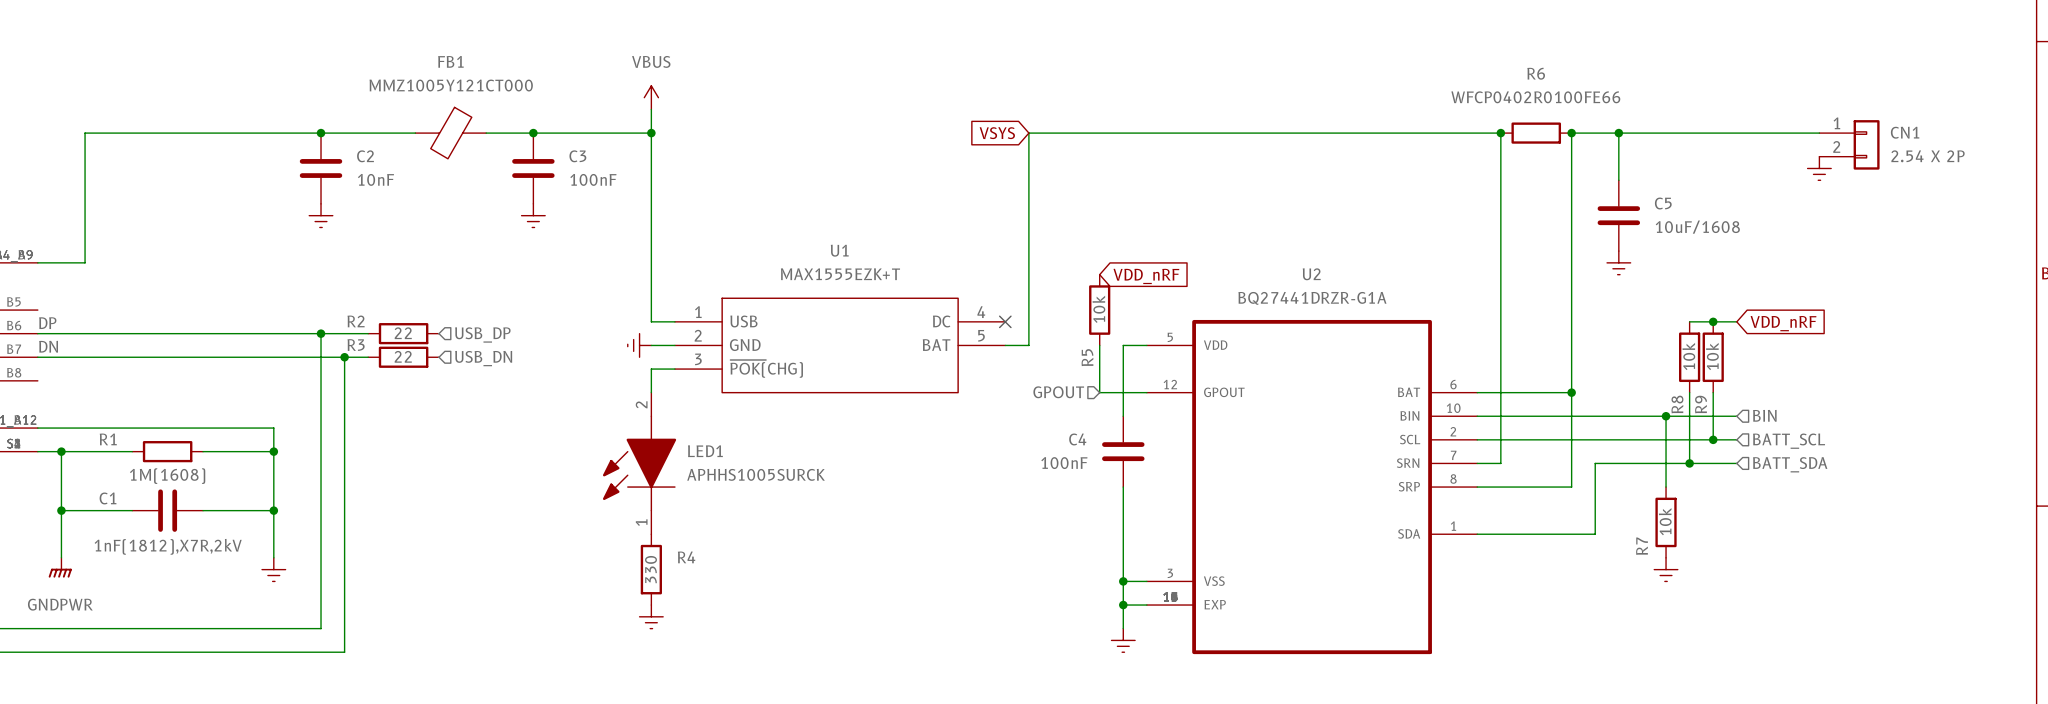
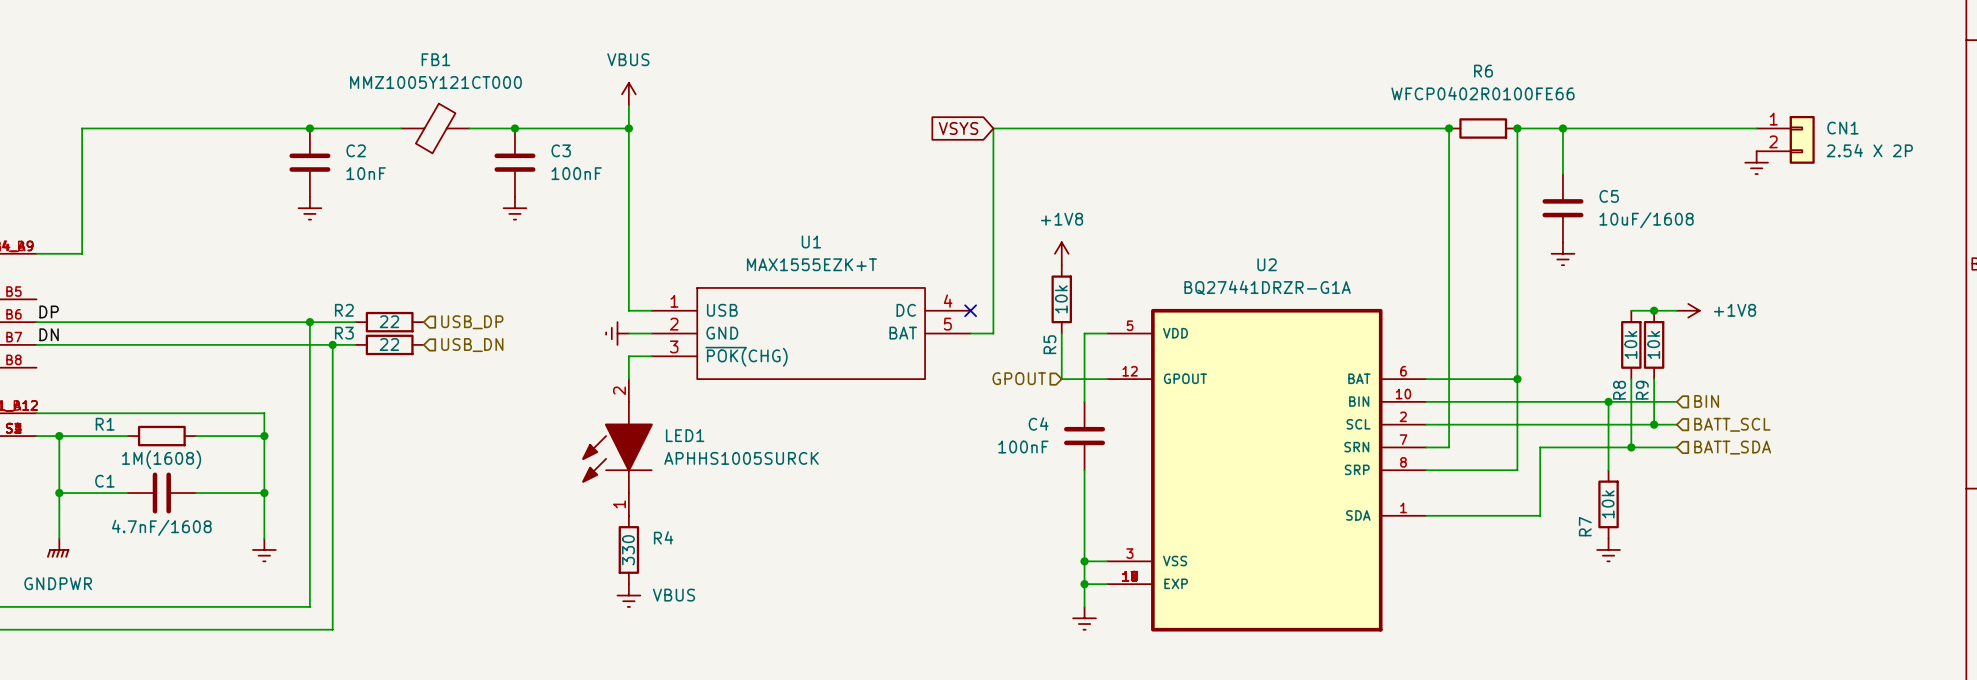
power symbol: none -> +1V8 (1061, 253)
global label: VDD_nRF (1146, 276) -> none
power symbol: none -> +1V8 (1688, 310)
global label: VDD_nRF (1783, 323) -> none
C1 value: 1nF(1812),X7R,2kV (168, 546) -> 4.7nF/1608 (161, 527)
power symbol text: none -> VBUS (673, 595)

